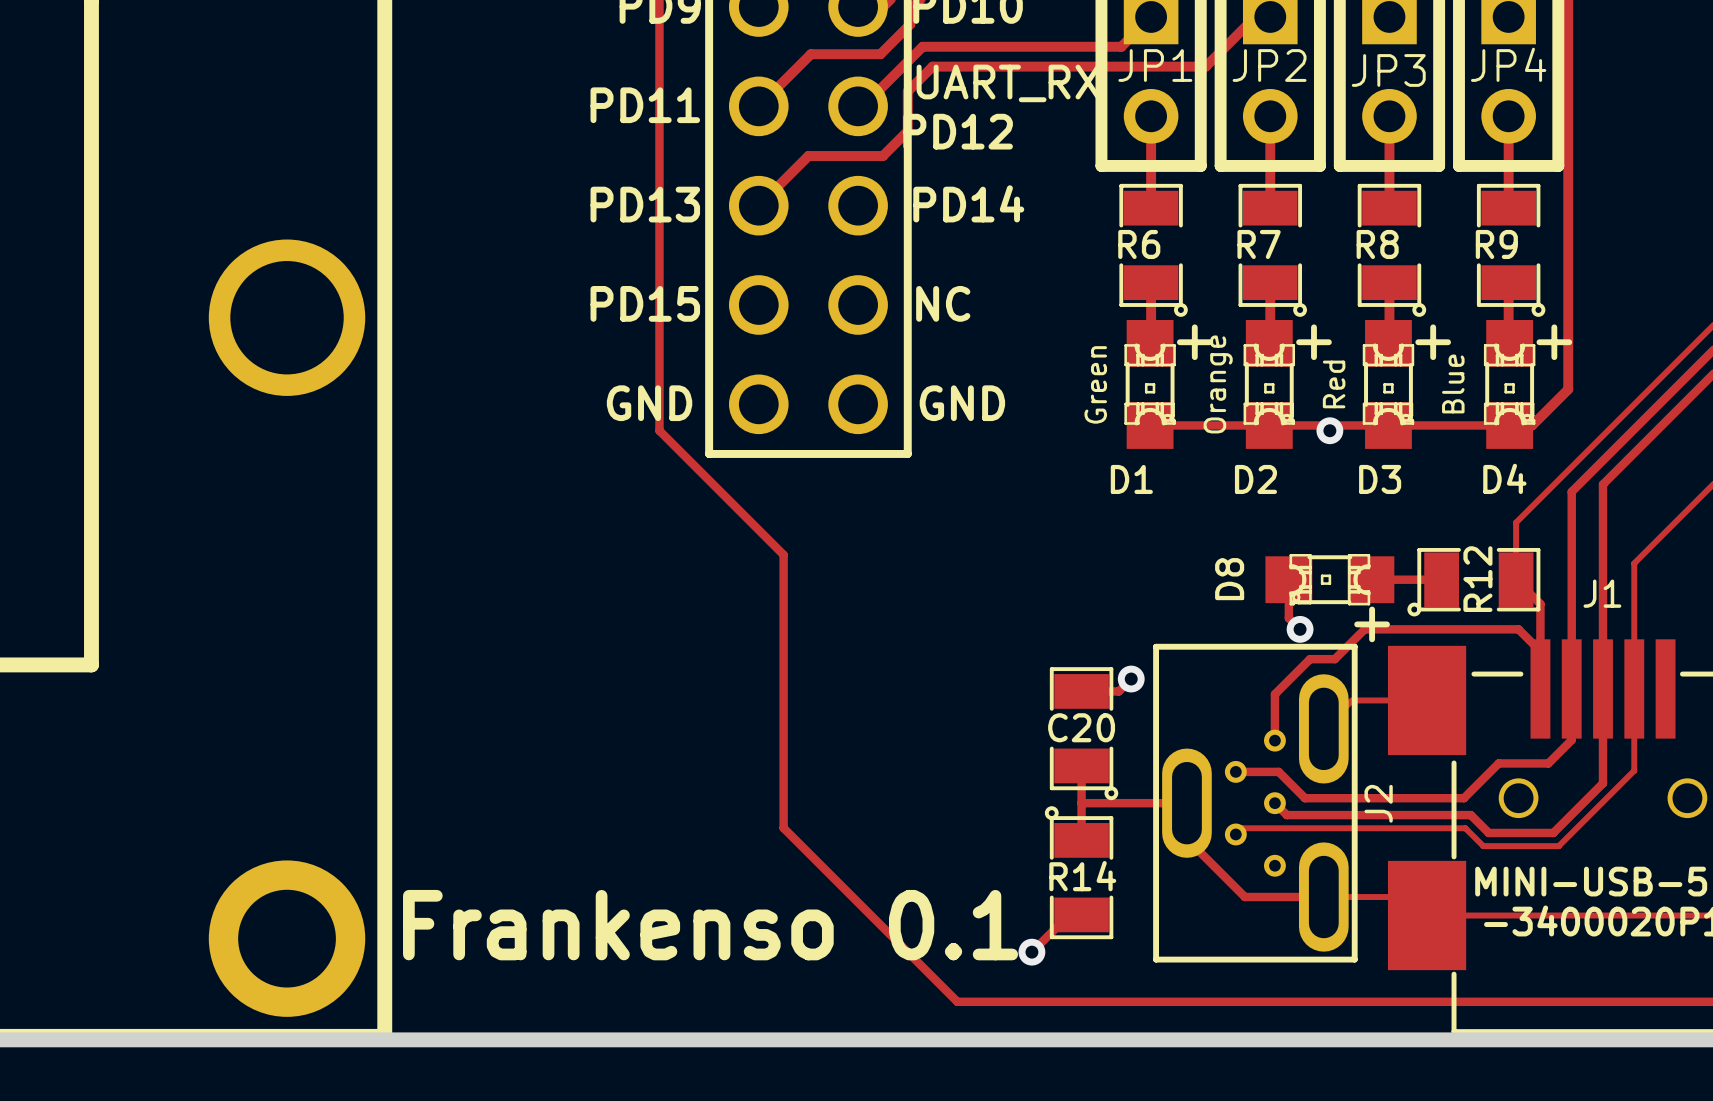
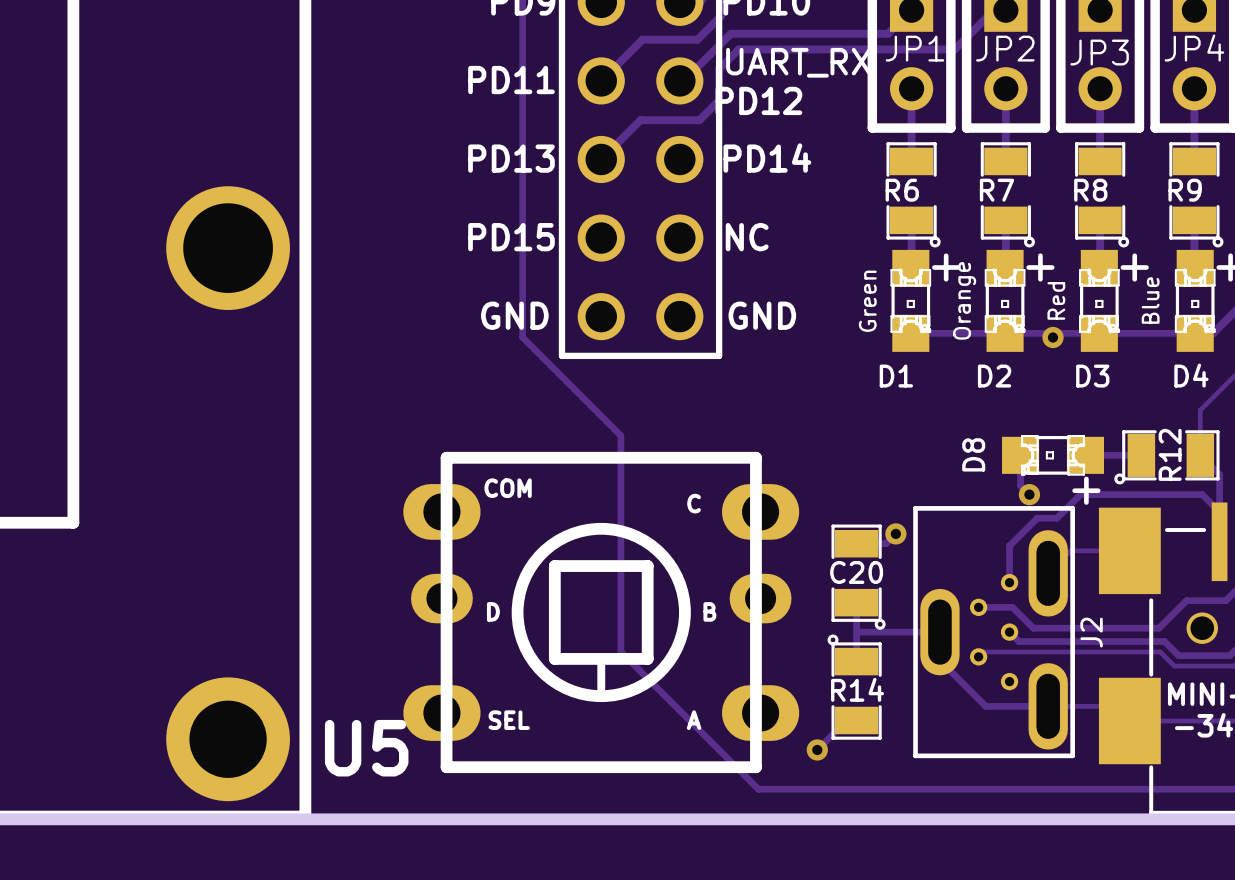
U5: none -> (601, 612)
text: Frankenso 0.1 (710, 925) -> none

